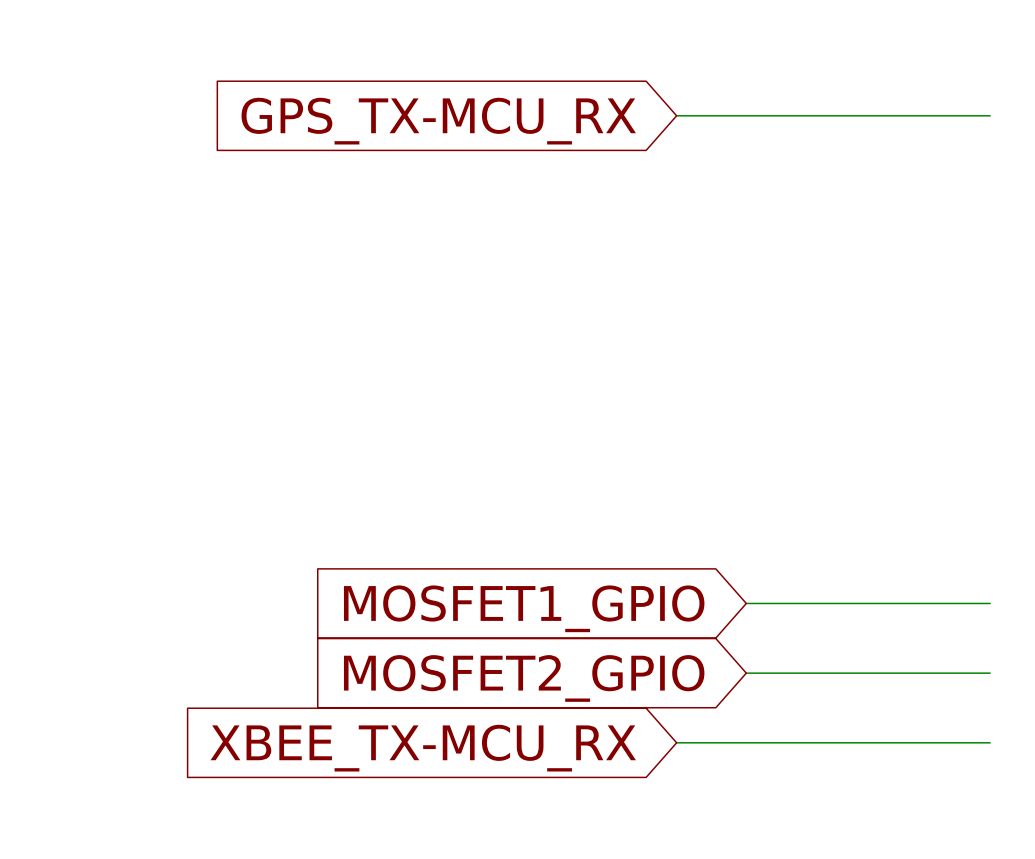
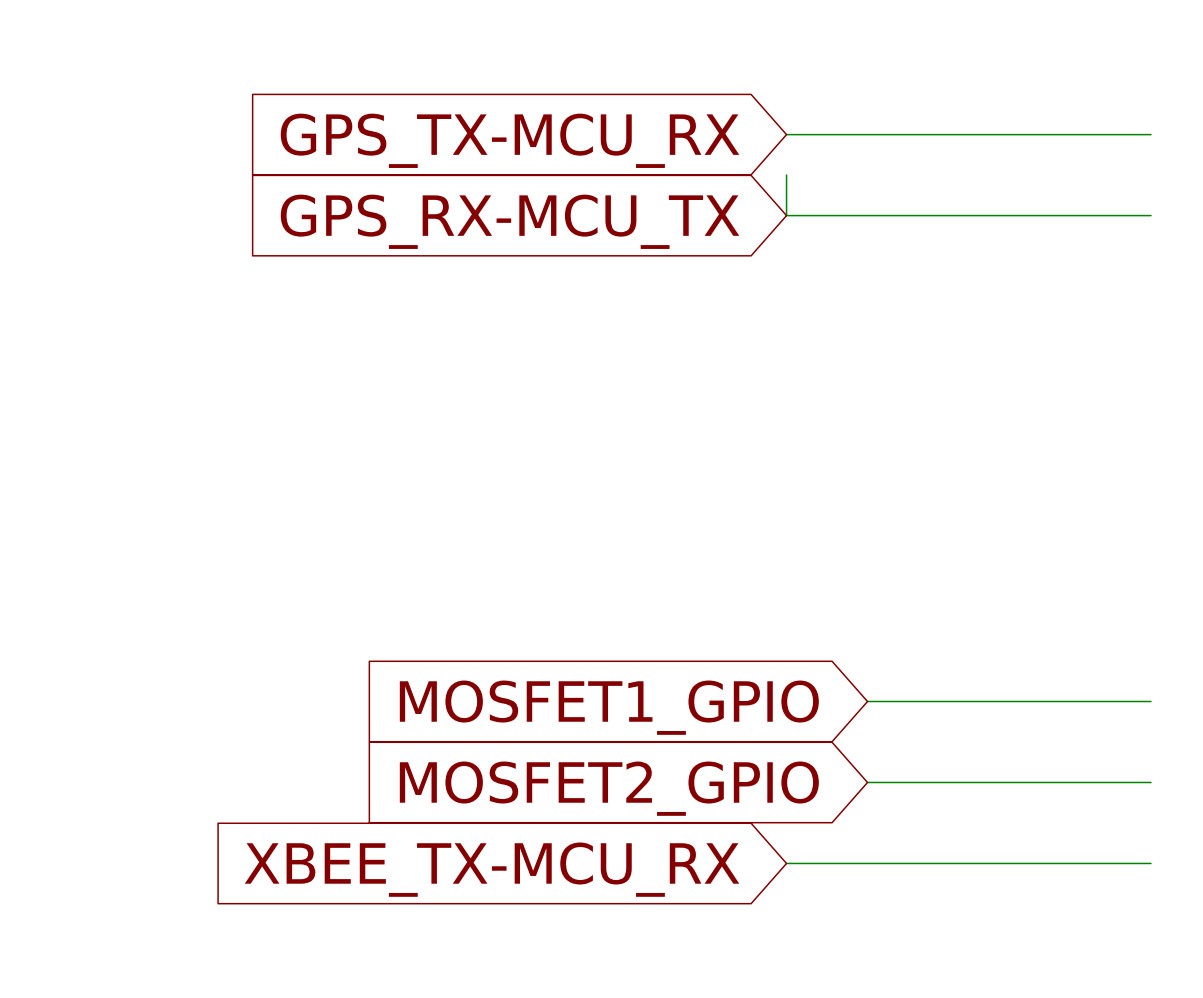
wire: none -> (786, 175) (786, 215) (1150, 215)
global label: none -> GPS_RX-MCU_TX (510, 221)

